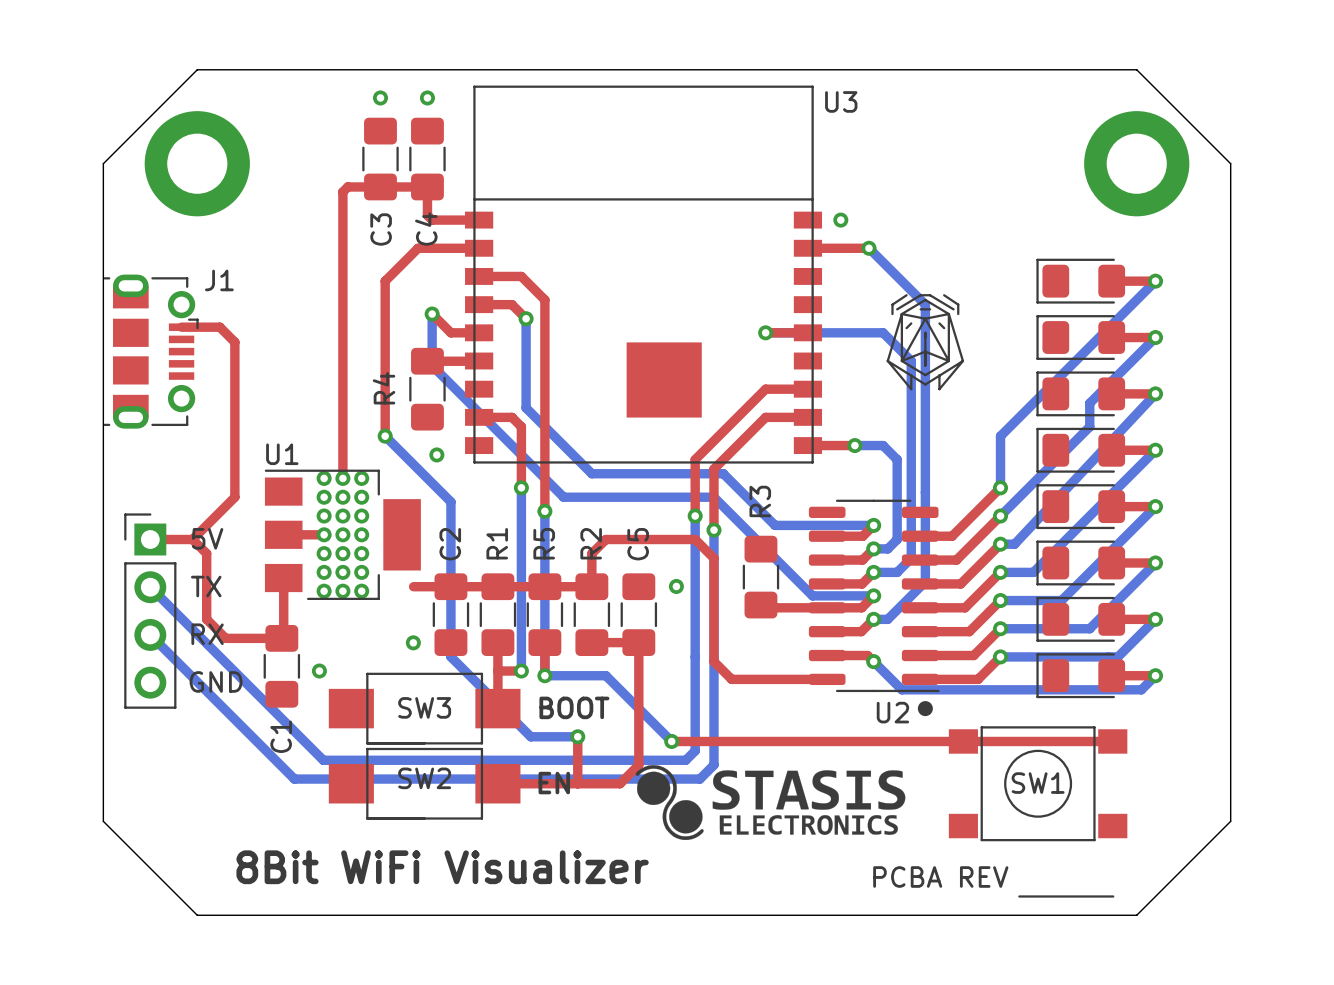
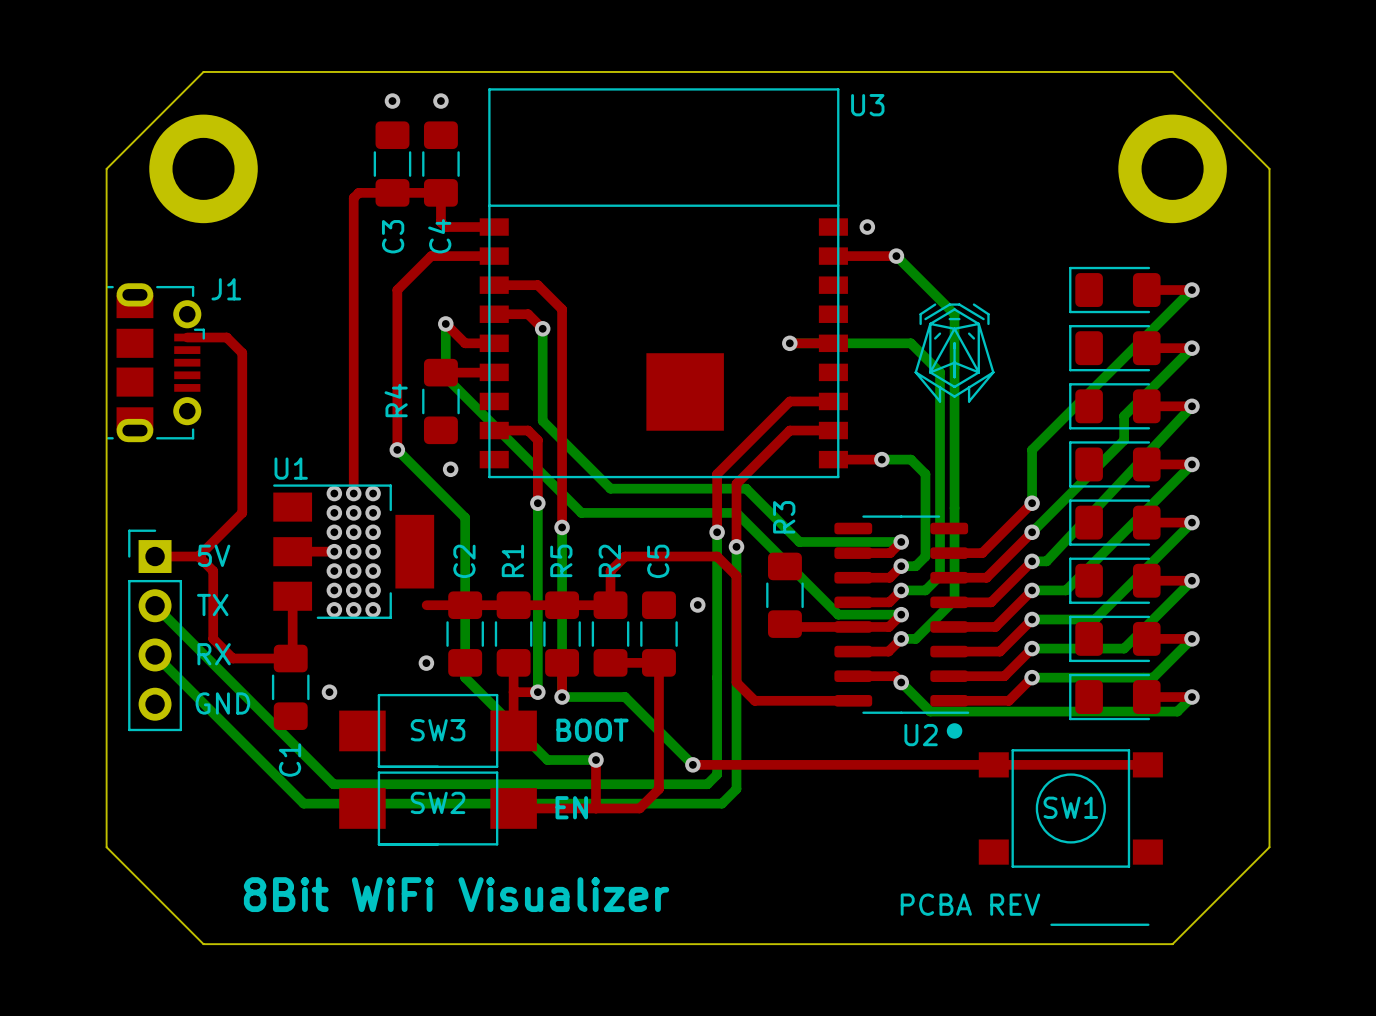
drawing: [635, 765, 906, 841] -> none

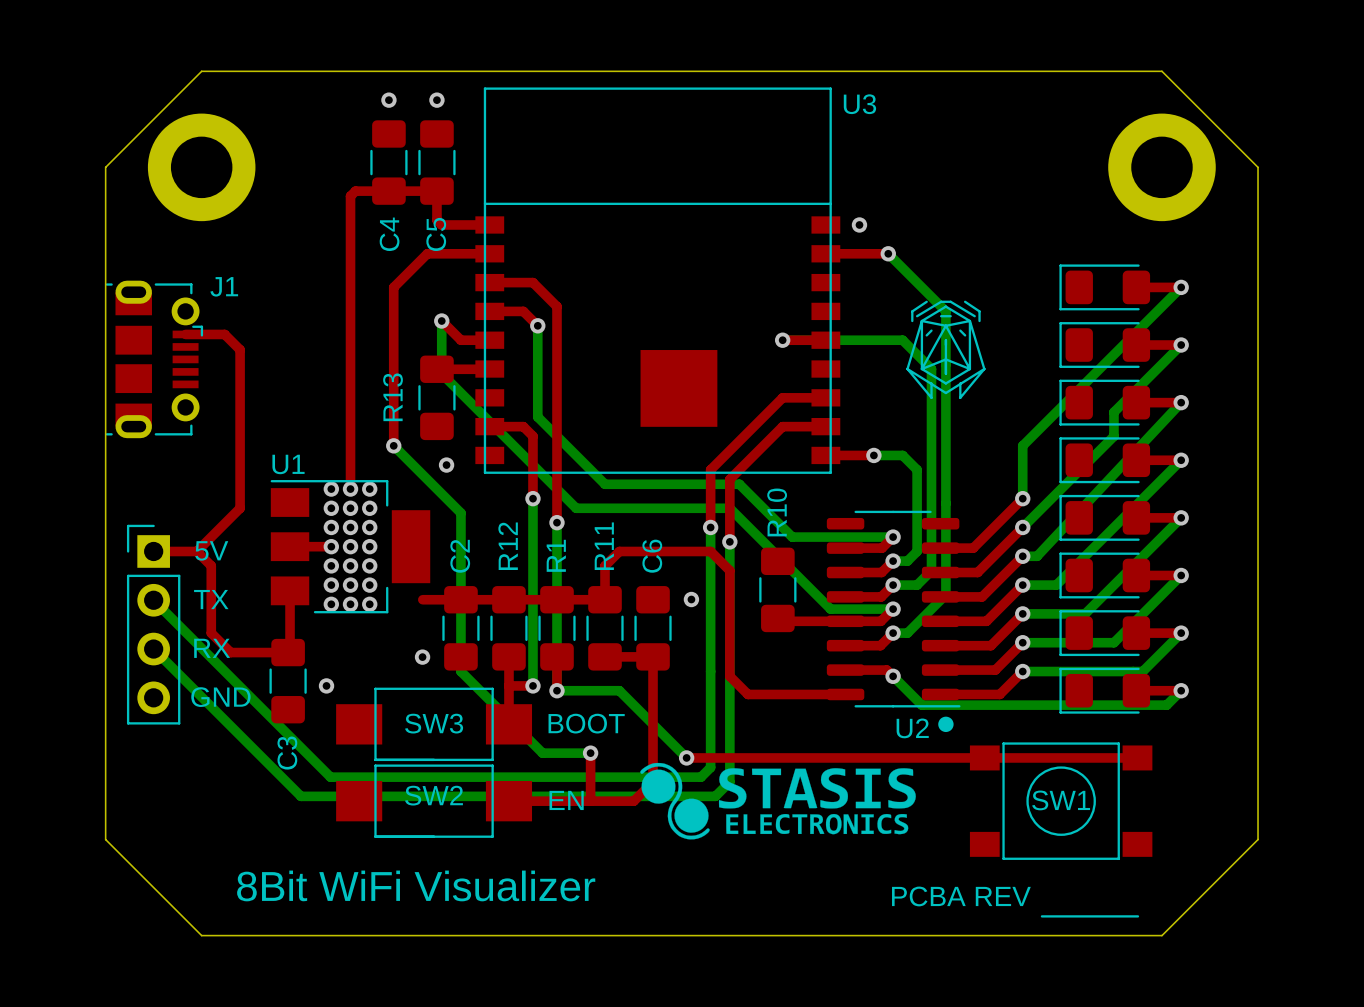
C3 name: C3 (393, 236) -> C4 (389, 234)
C4 name: C4 (439, 236) -> C5 (436, 234)
R4 name: R4 (396, 400) -> R13 (393, 397)
R3 name: R3 (784, 517) -> R10 (777, 512)
R1 name: R1 (512, 560) -> R12 (508, 546)
R5 name: R5 (561, 560) -> R1 (556, 555)
R2 name: R2 (609, 560) -> R11 (604, 546)
C5 name: C5 (658, 561) -> C6 (652, 556)
C1 name: C1 (290, 760) -> C3 (287, 753)
drawing: none -> [640, 762, 916, 840]

